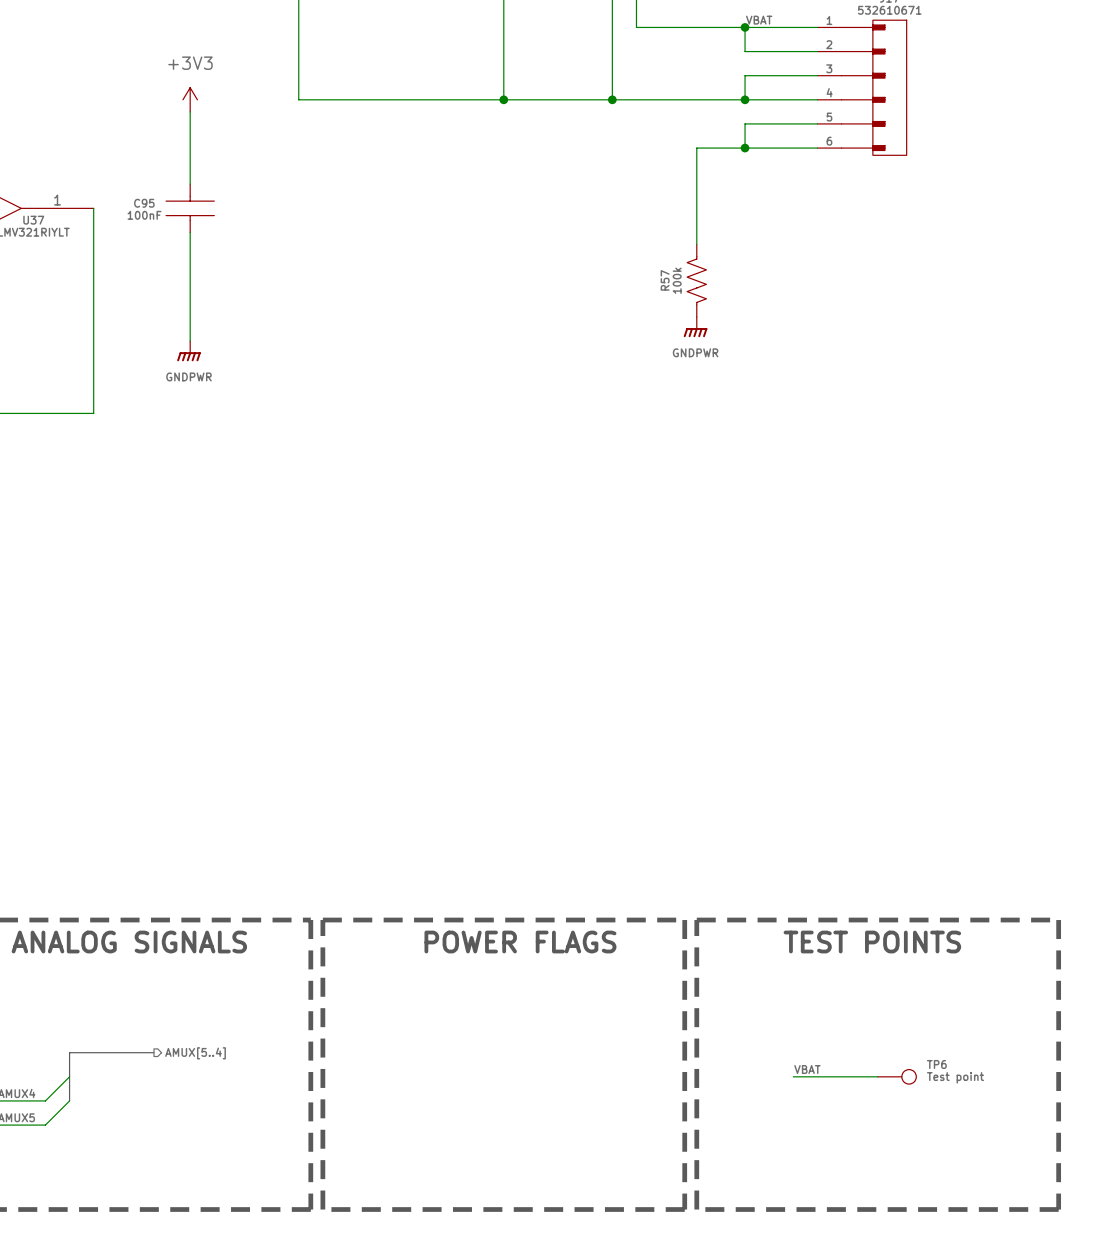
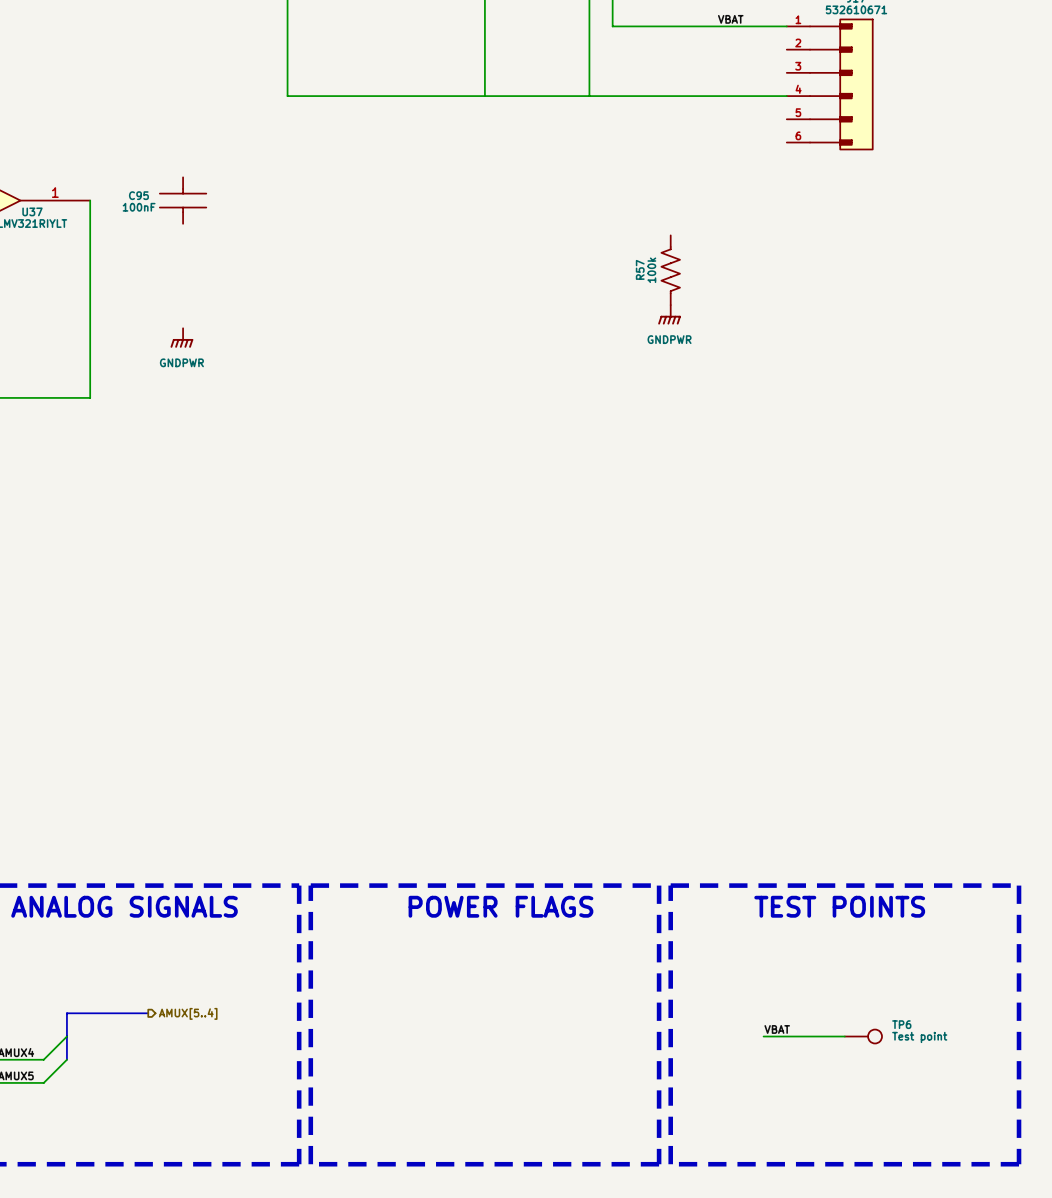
wire: (745, 27) (745, 51) (817, 51) -> none
junction: (745, 27) -> none
wire: (817, 75) (745, 75) (745, 99) -> none
power symbol: +3V3 (190, 99) -> none
junction: (503, 99) -> none
junction: (612, 99) -> none
junction: (745, 99) -> none
wire: (190, 111) (190, 184) -> none
wire: (817, 123) (745, 123) (745, 148) -> none
junction: (745, 148) -> none
wire: (817, 148) (696, 148) (696, 244) -> none
wire: (190, 232) (190, 341) -> none

